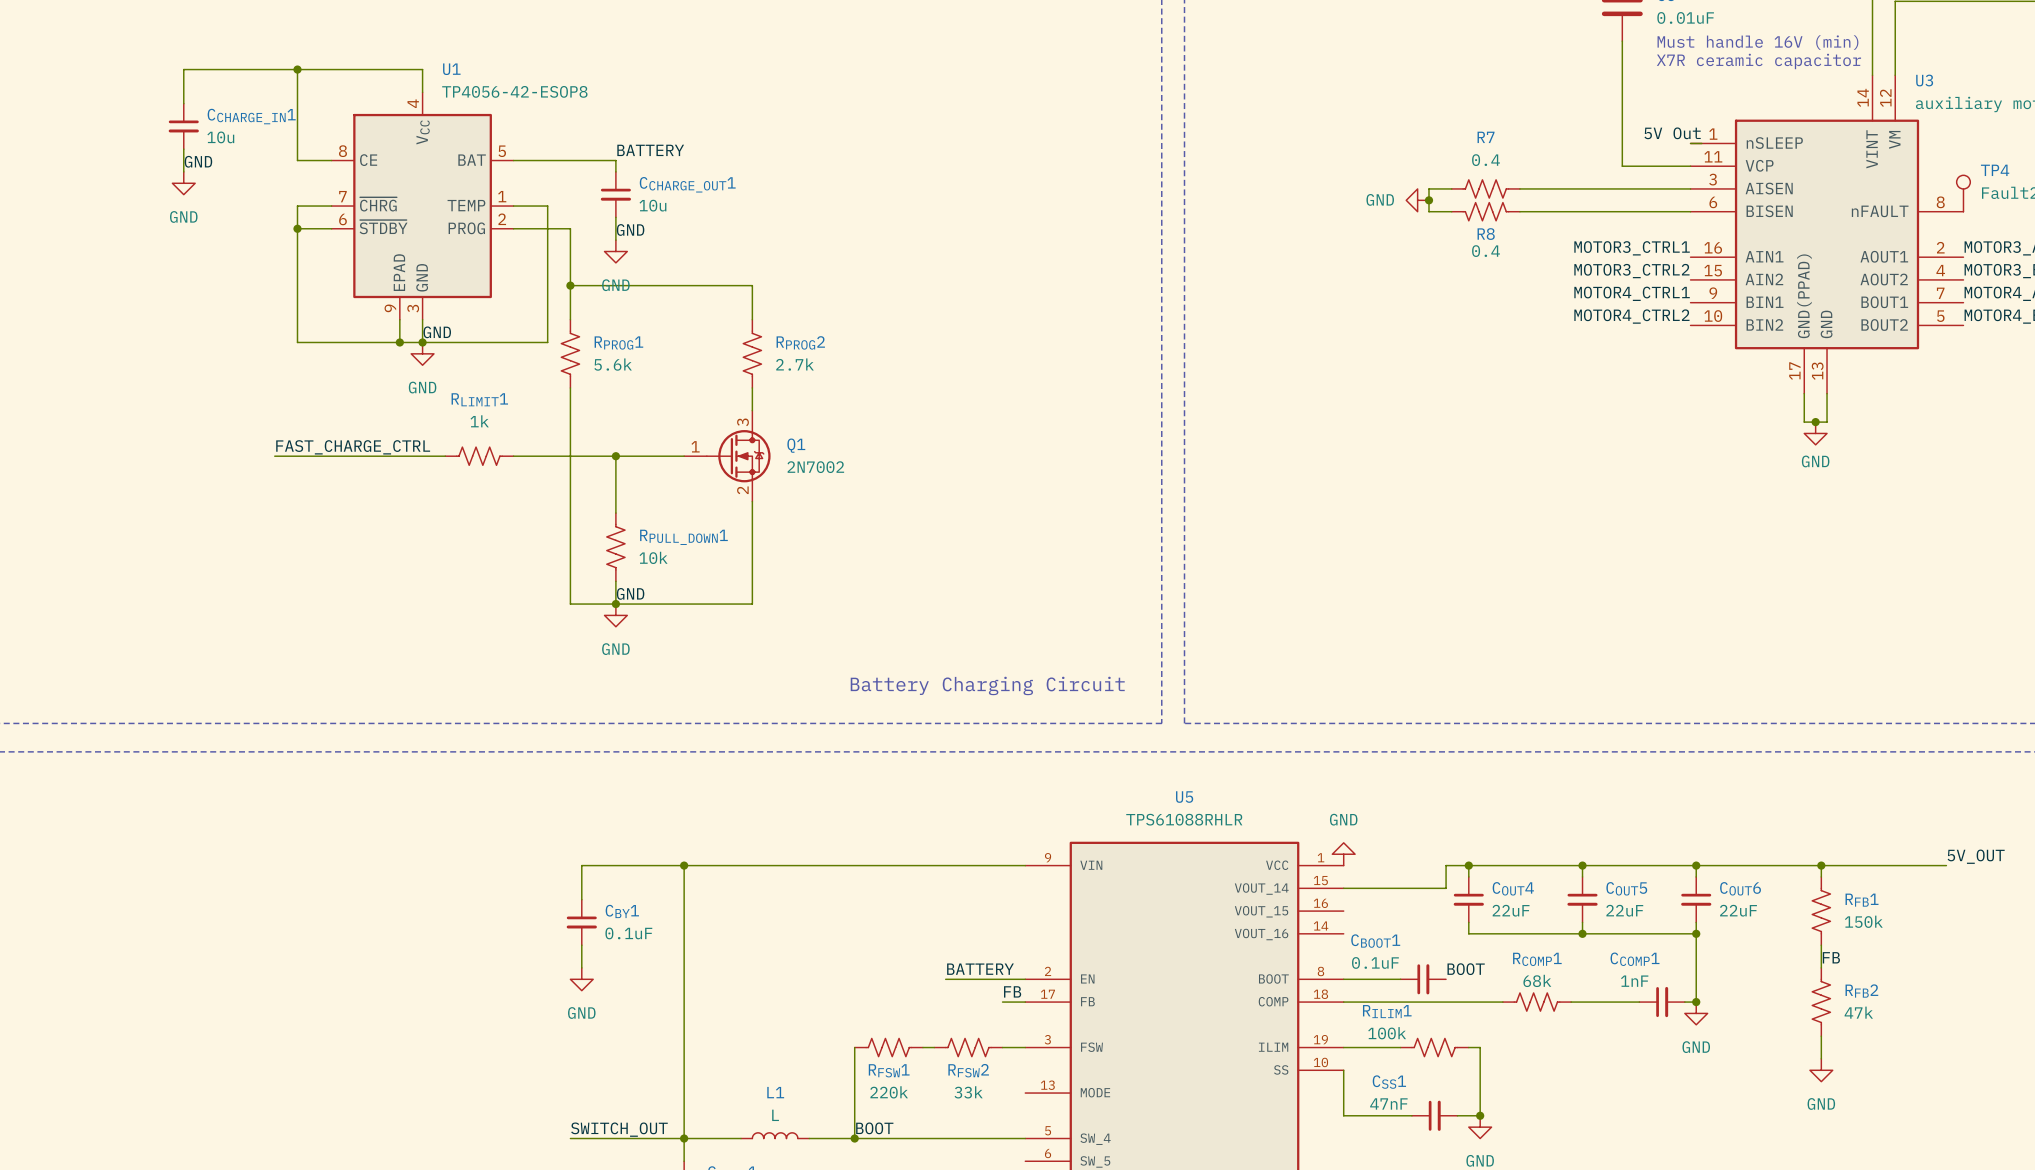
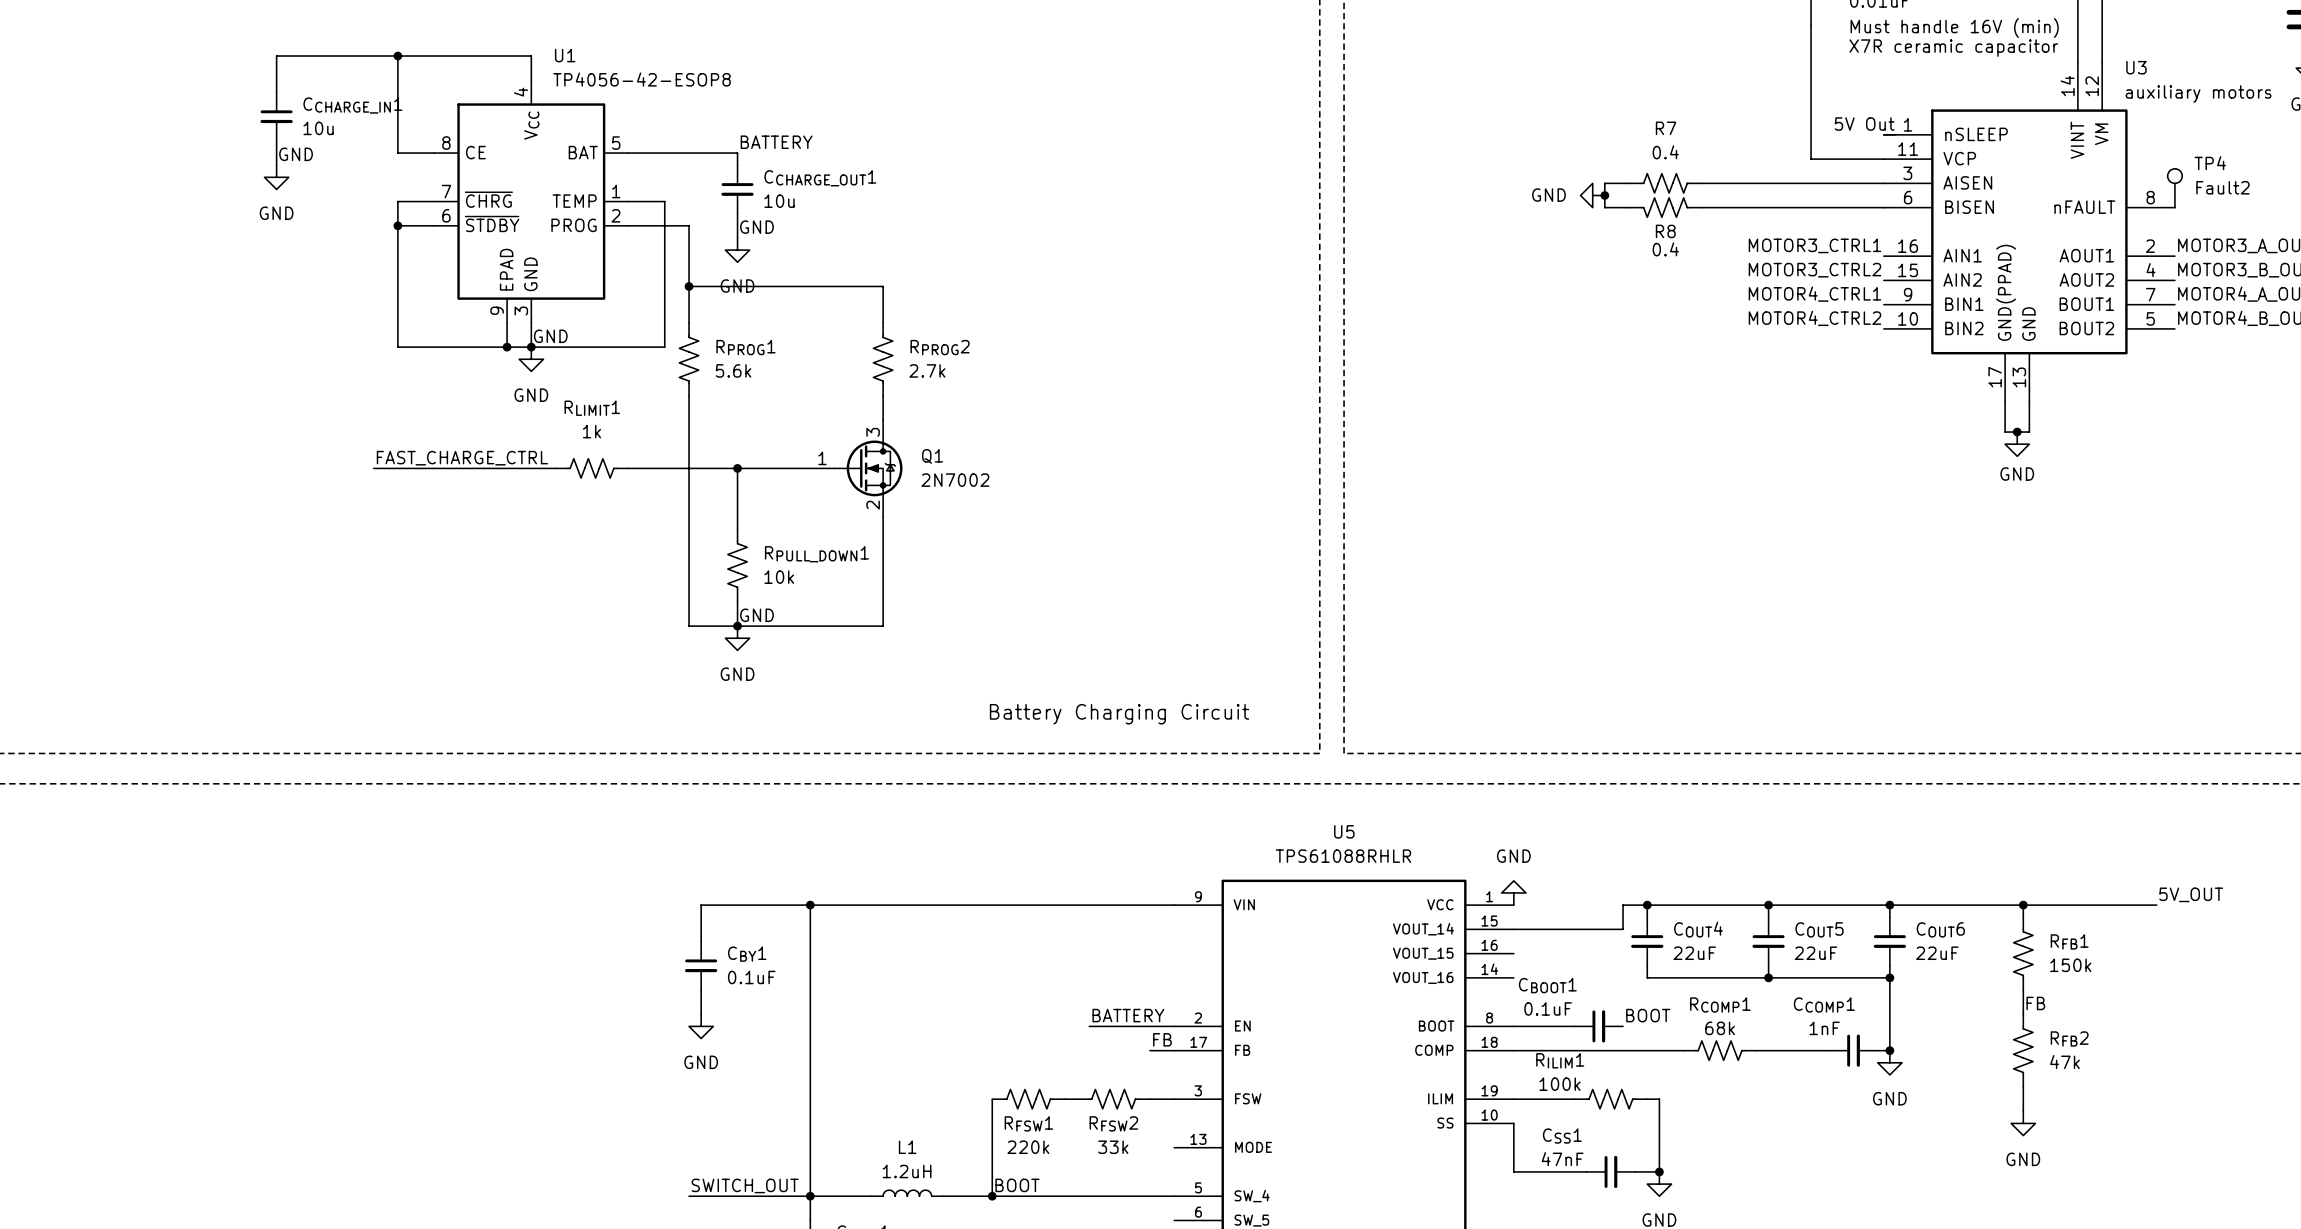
L1 value: L (775, 1115) -> 1.2uH (907, 1171)

